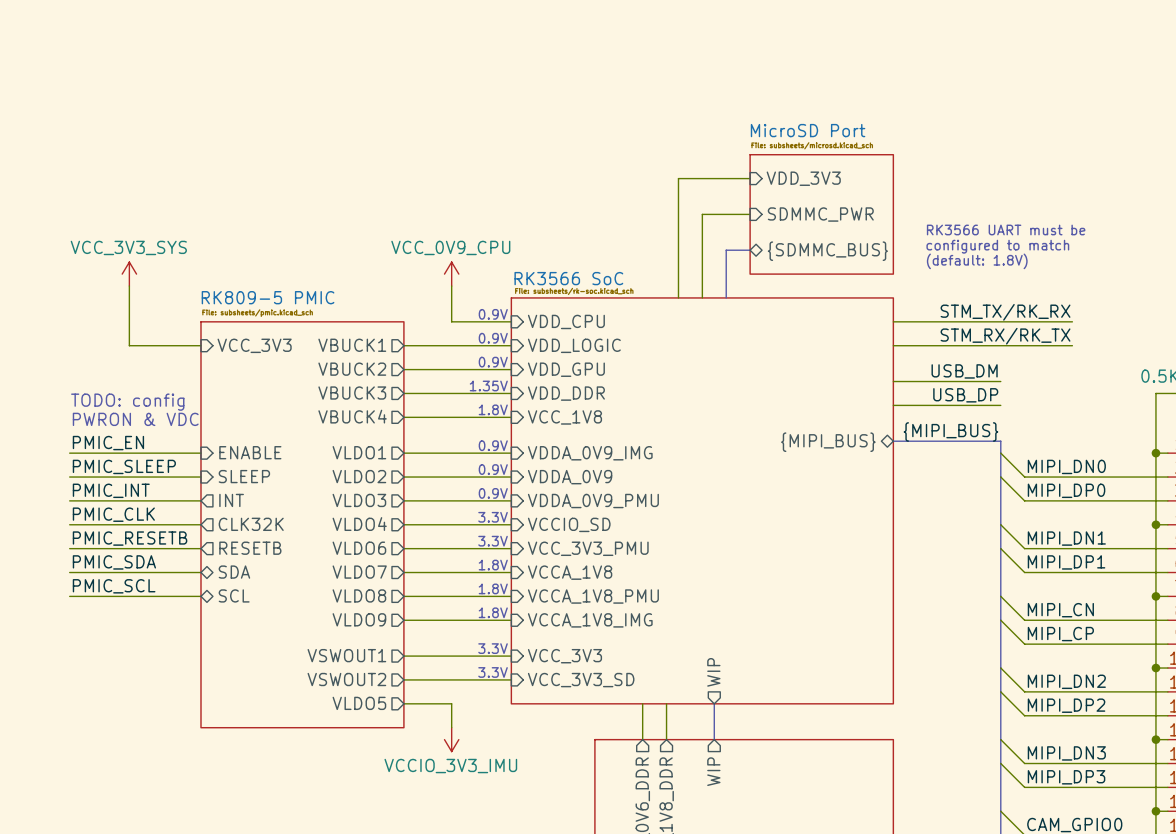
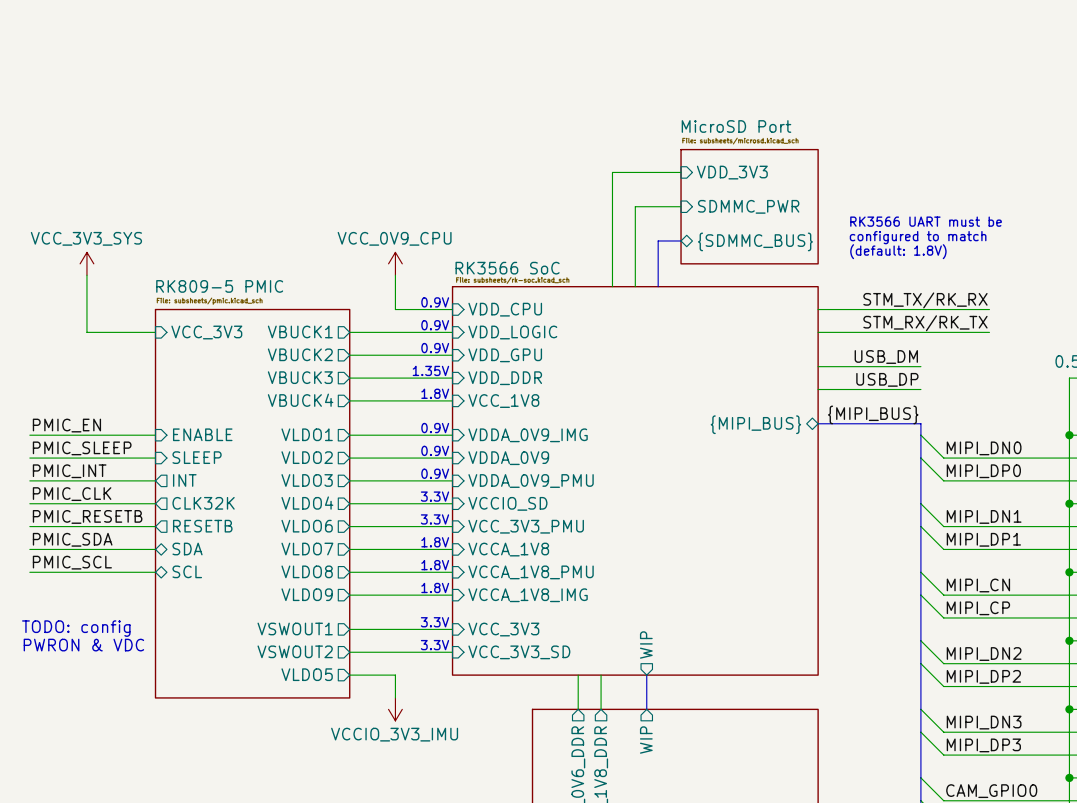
text: TODO: config (127, 402) -> none
text: PWRON & VDC (135, 419) -> none
text: none -> TODO: config (76, 628)
text: none -> PWRON & VDC (83, 645)

